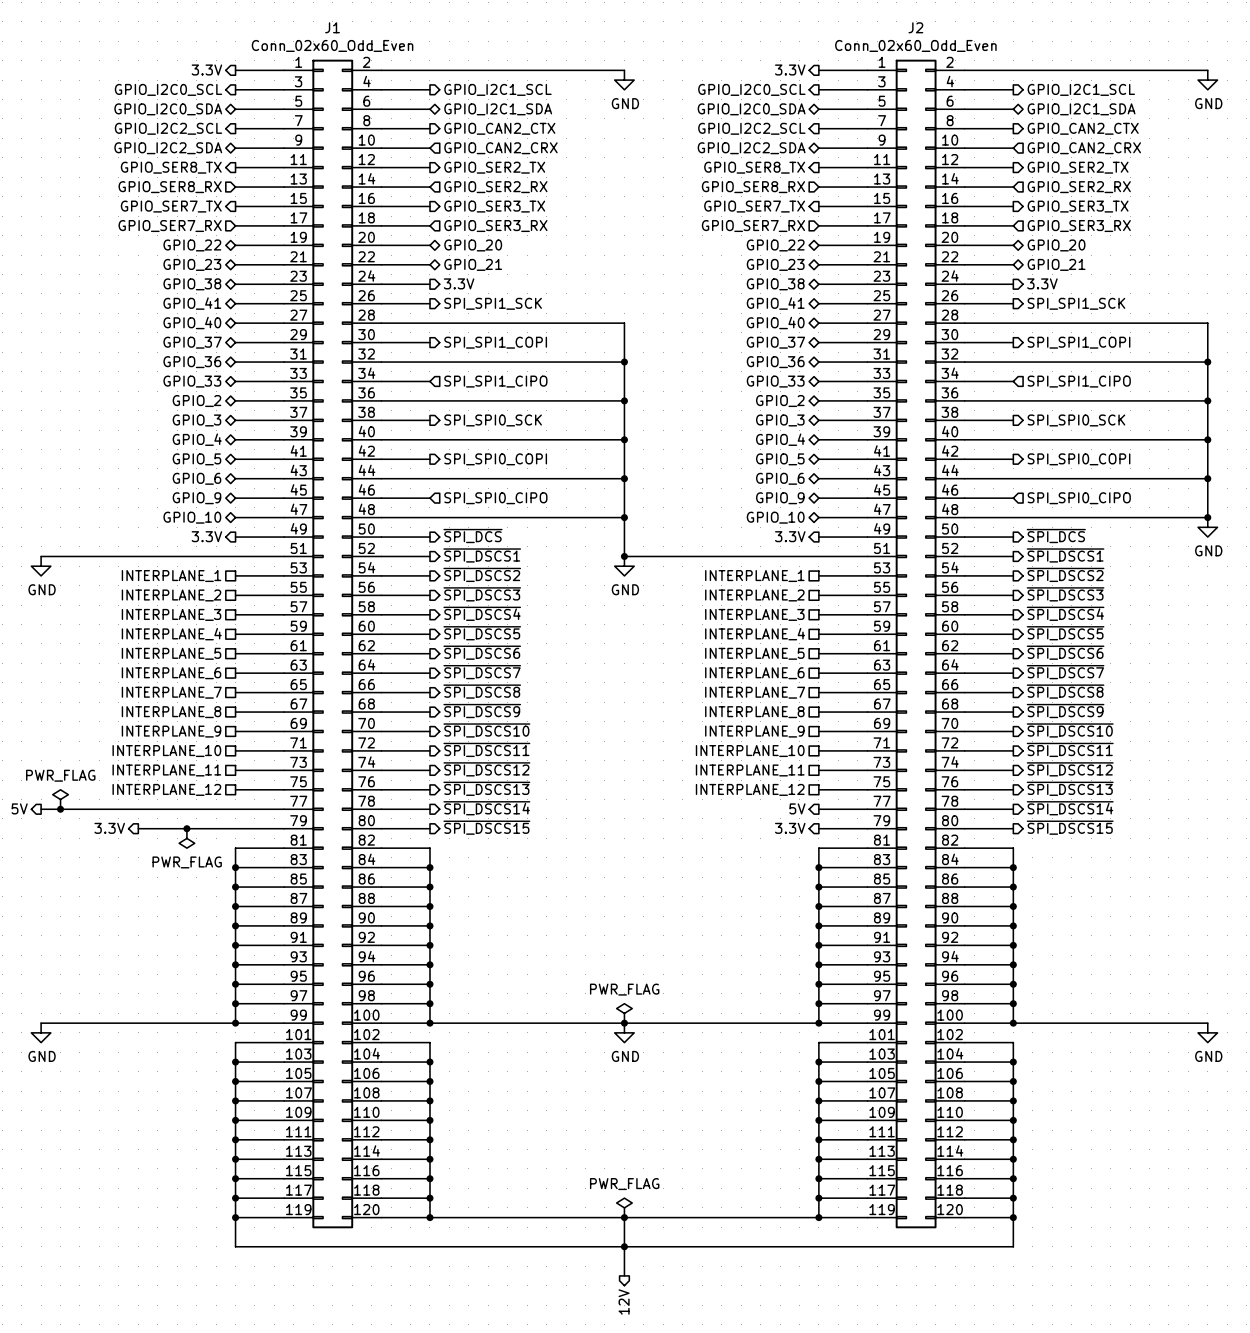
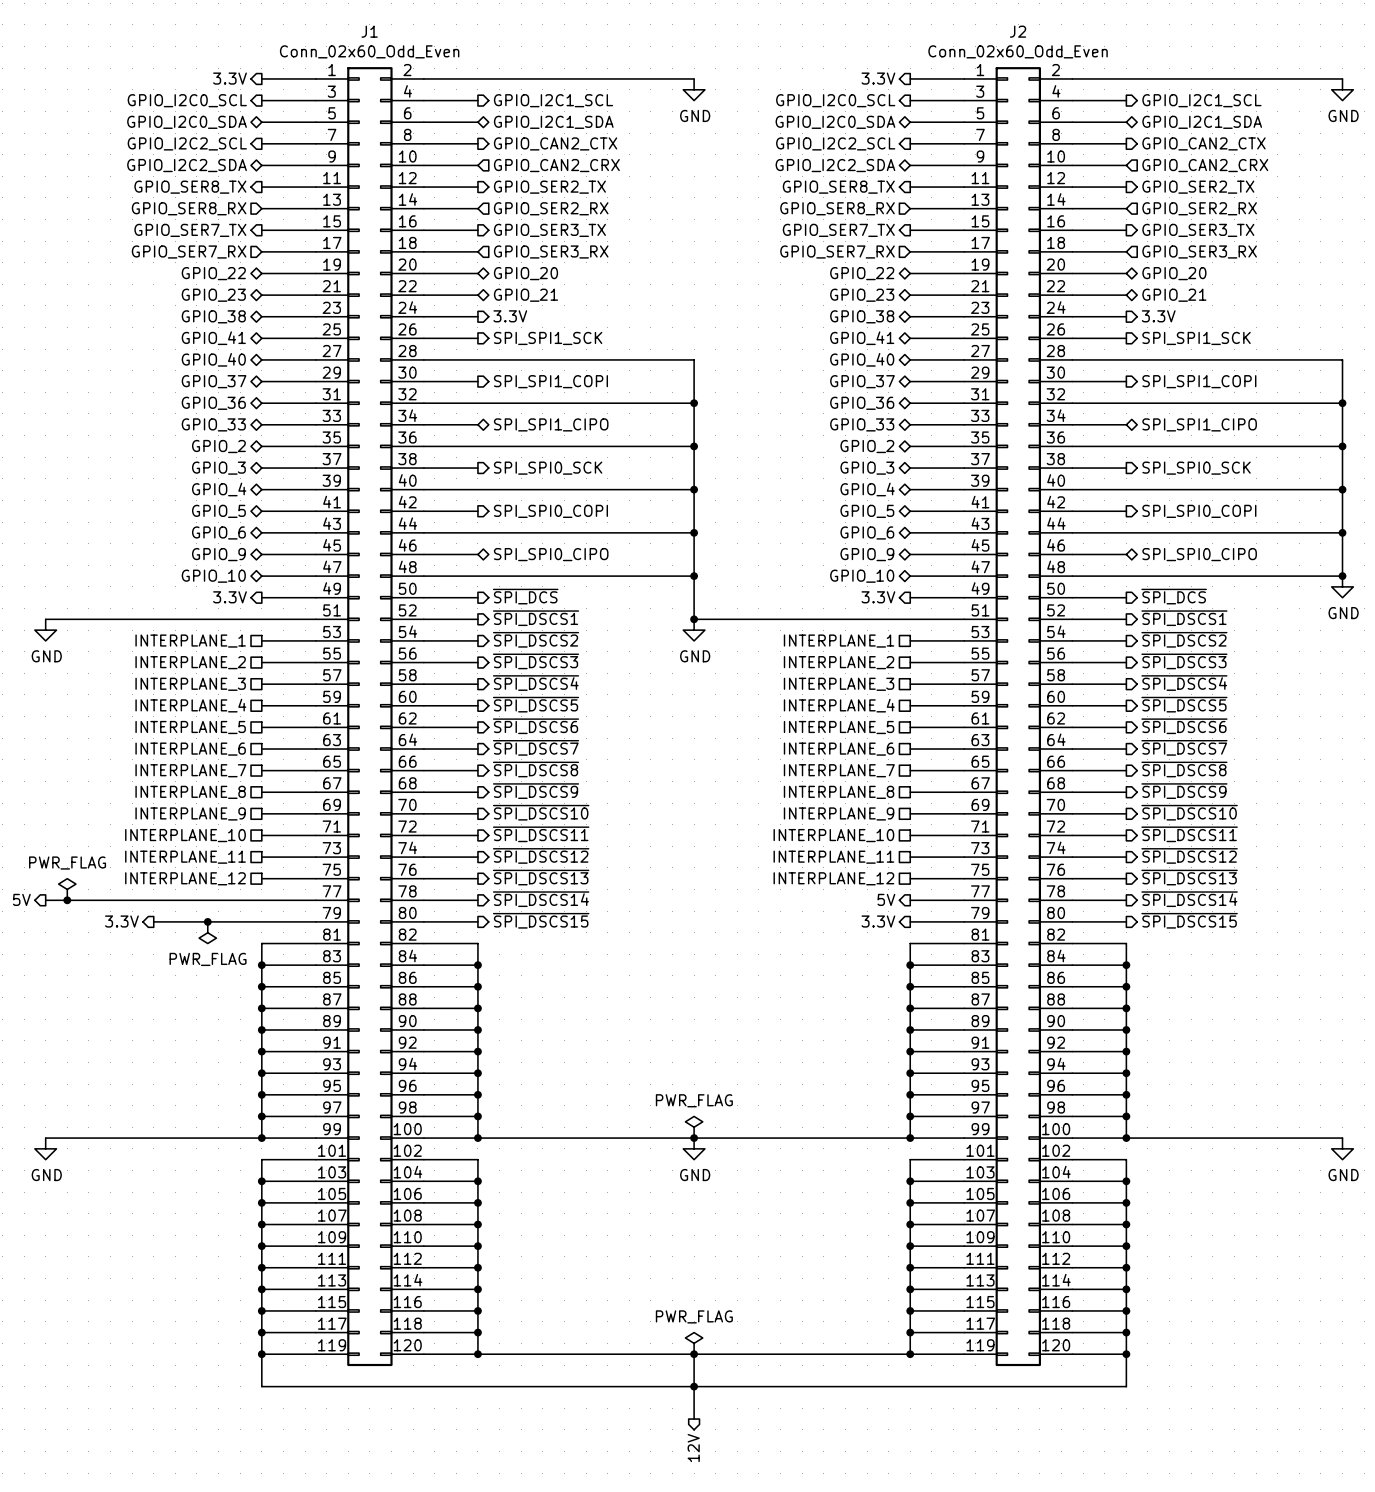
hierarchical label shape: input (495, 381) -> bidirectional (551, 424)
hierarchical label shape: input (1079, 381) -> bidirectional (1199, 424)
hierarchical label shape: input (495, 498) -> bidirectional (551, 554)
hierarchical label shape: input (1079, 498) -> bidirectional (1199, 554)

